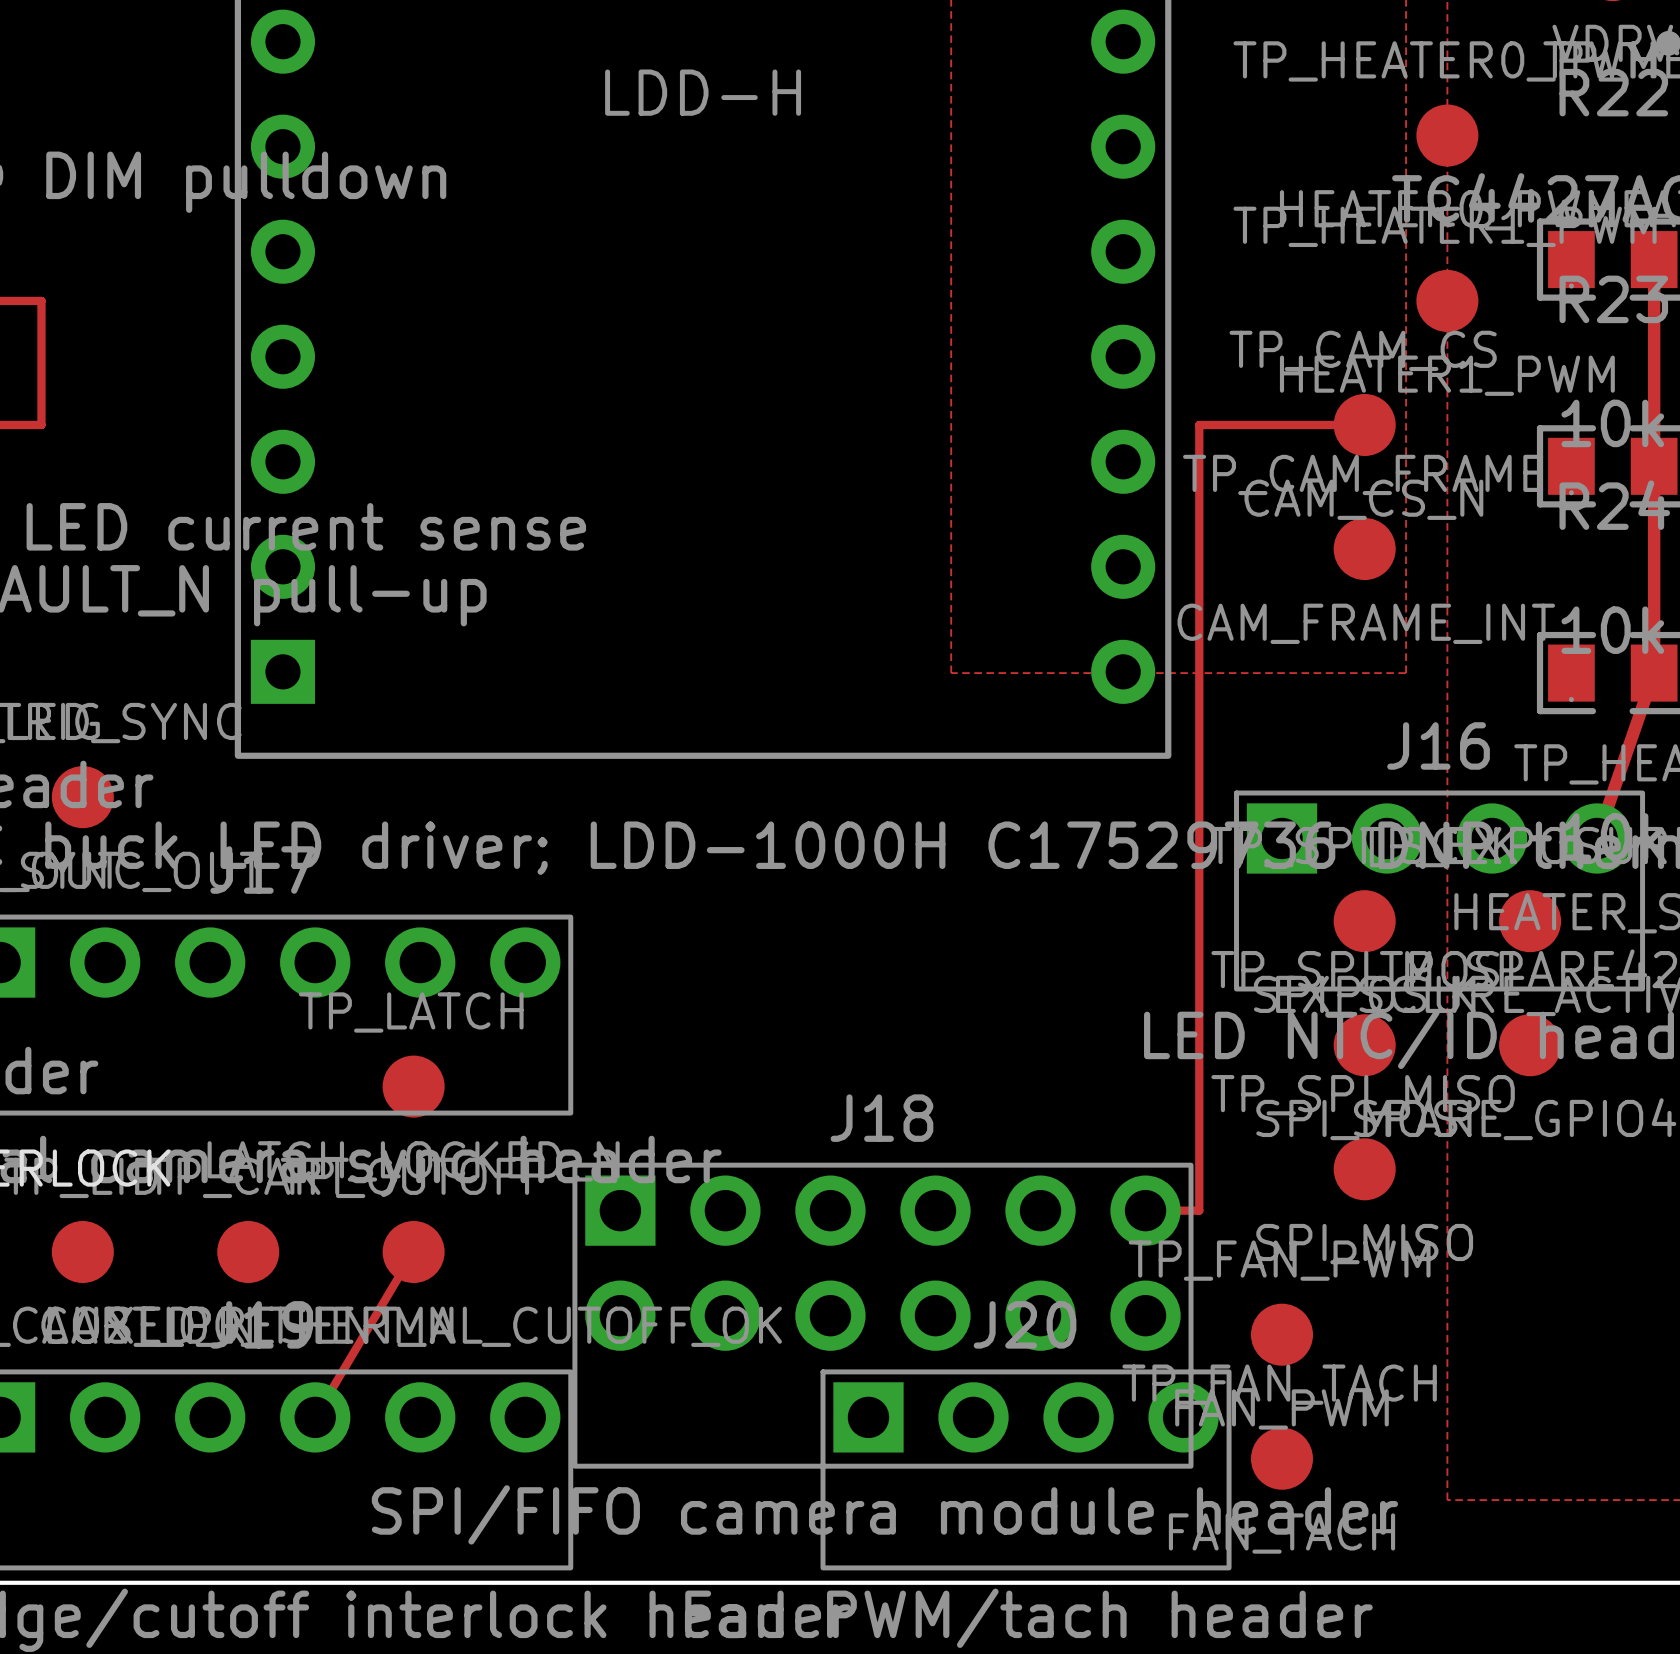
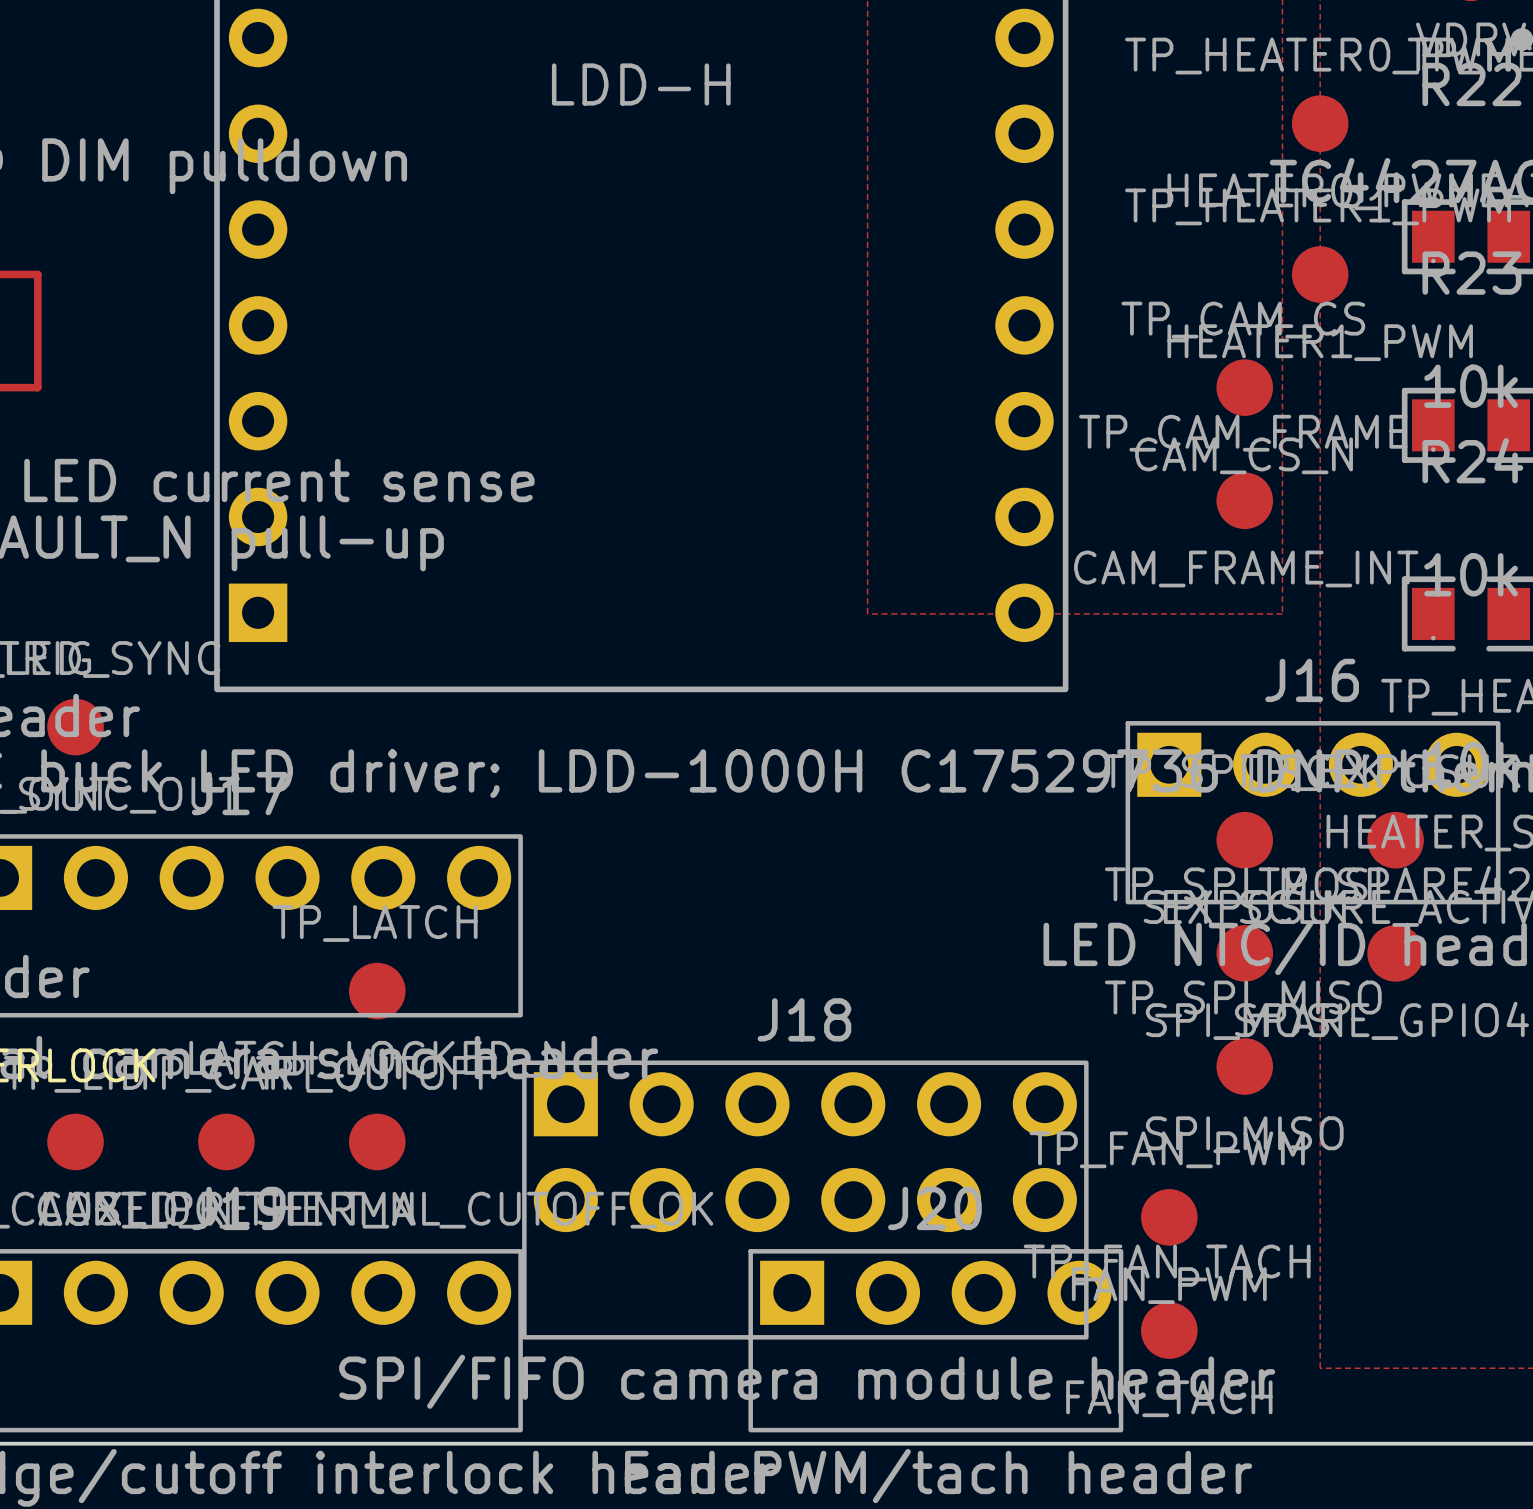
track: (1654, 259) (1654, 673) (1597, 838) -> none
track: (1364, 424) (1199, 424) (1199, 1210) (1145, 1210) -> none
track: (413, 1251) (315, 1417) -> none

